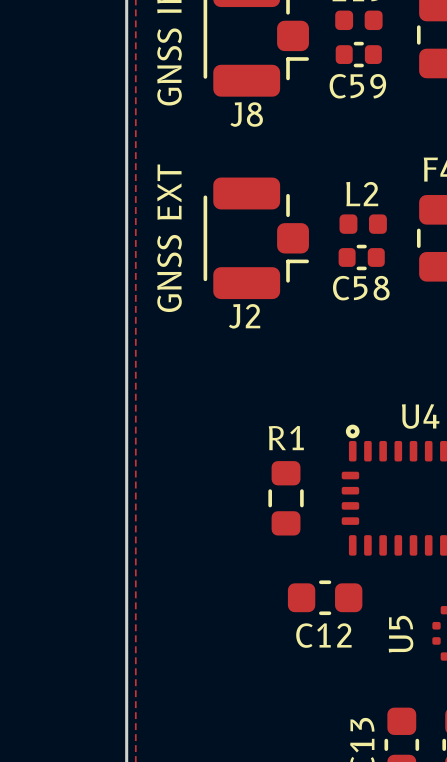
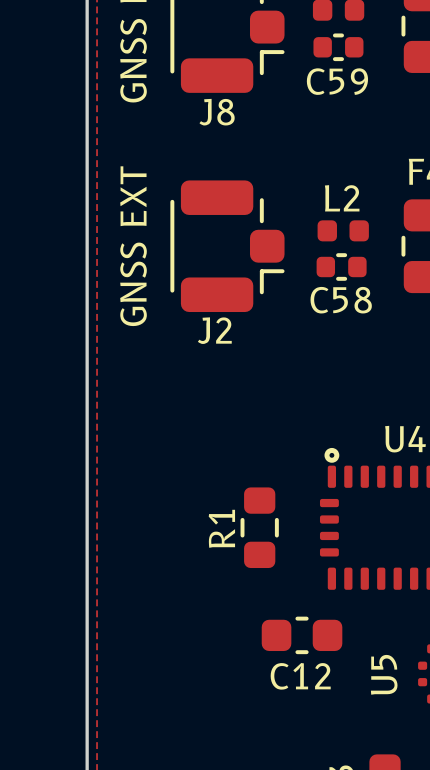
R1 name rotation: 0° (286, 438) -> 90° counterclockwise (221, 528)
R1 name position: R1 (286, 438) -> R1 (221, 528)

